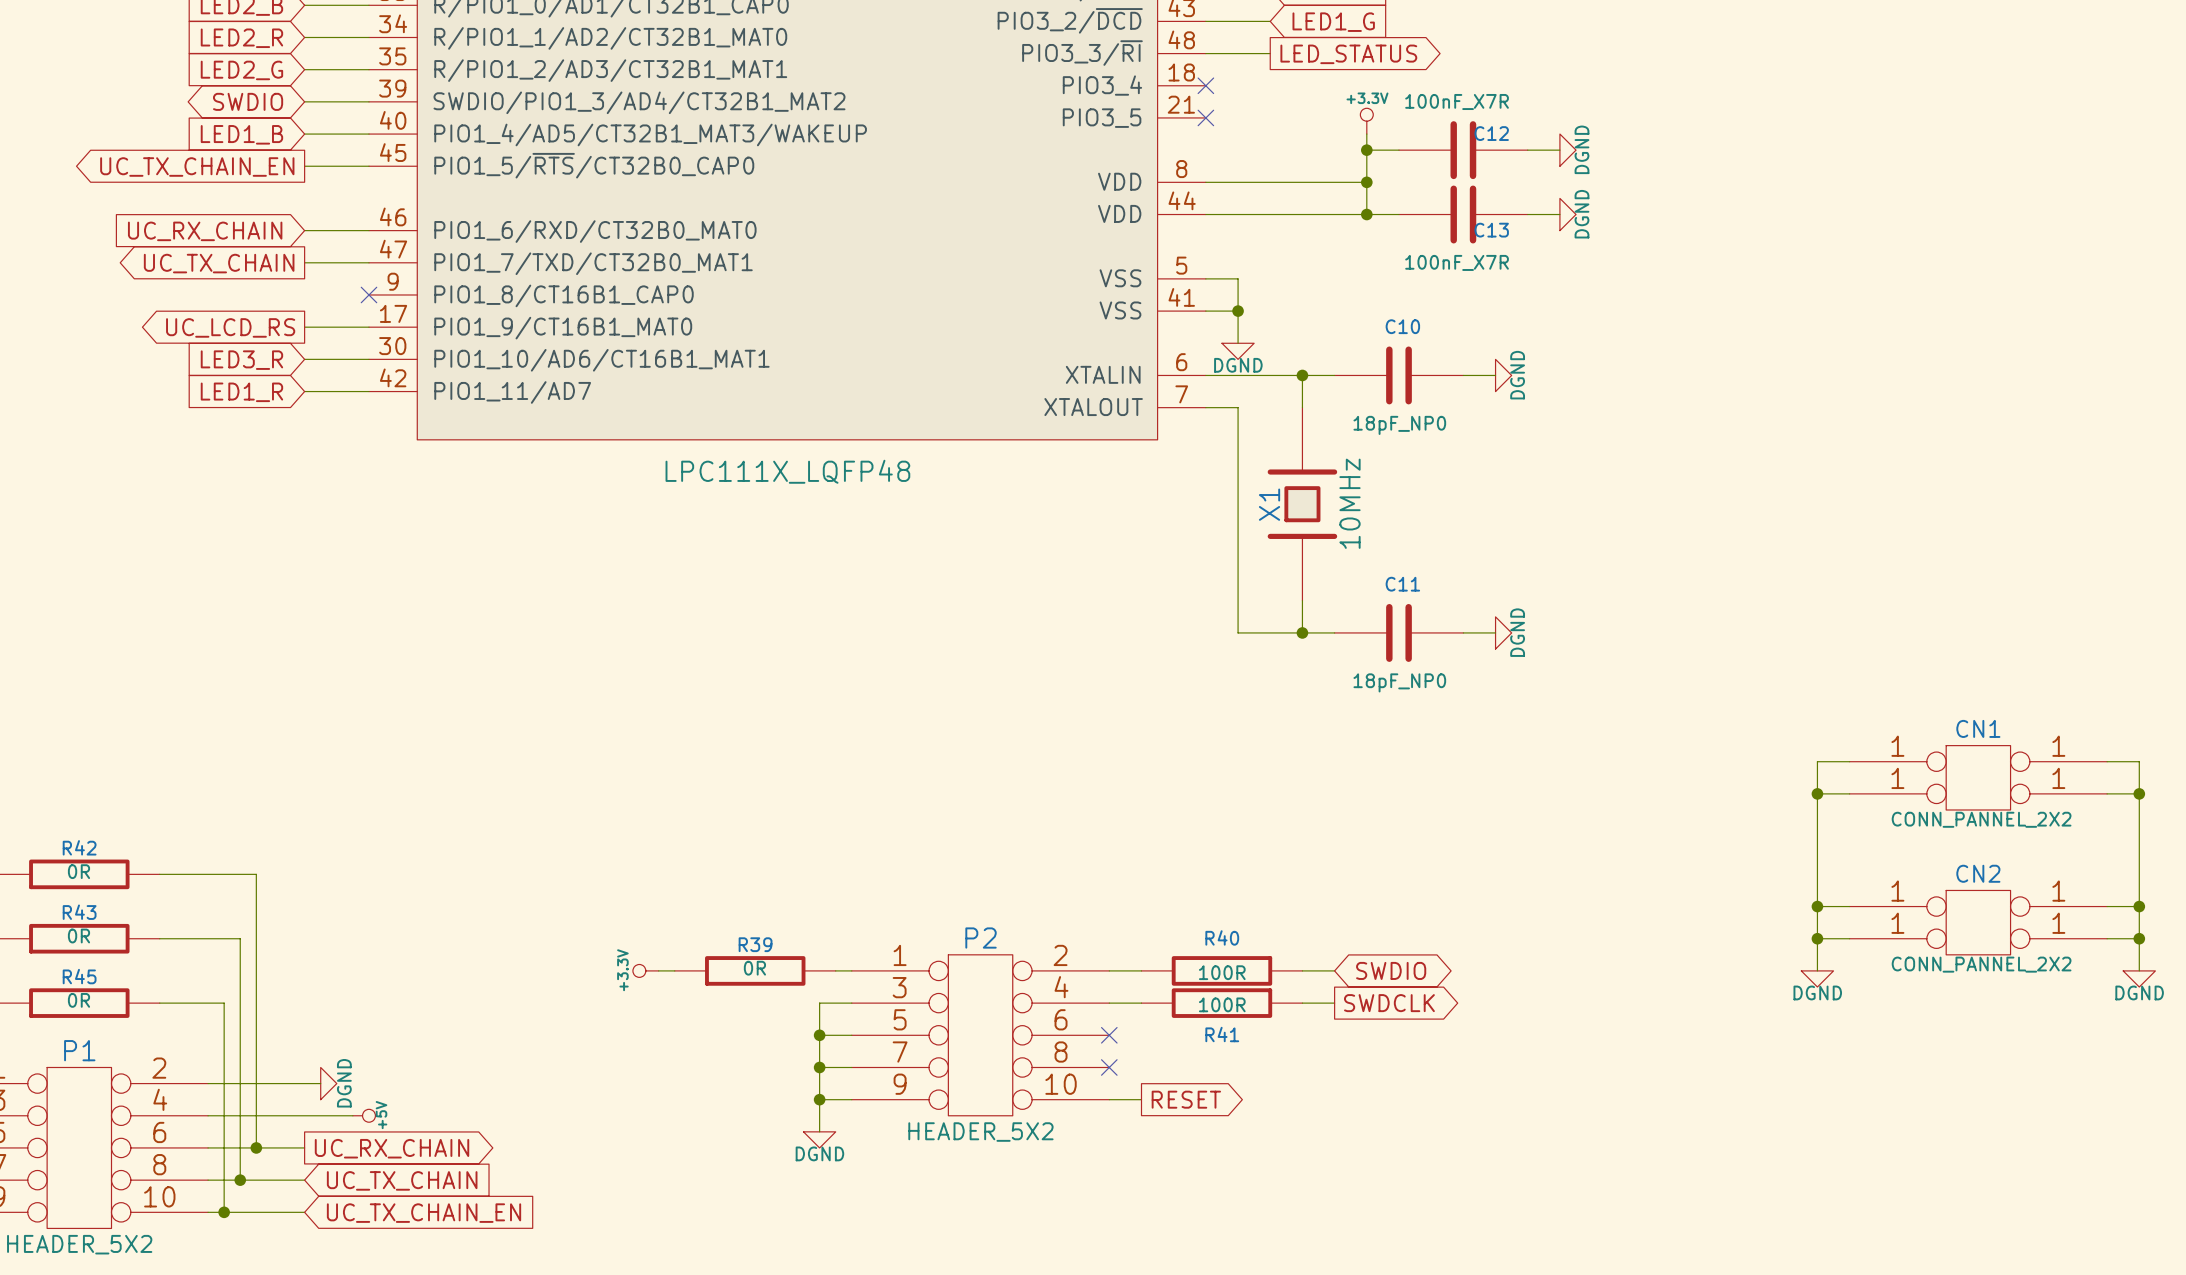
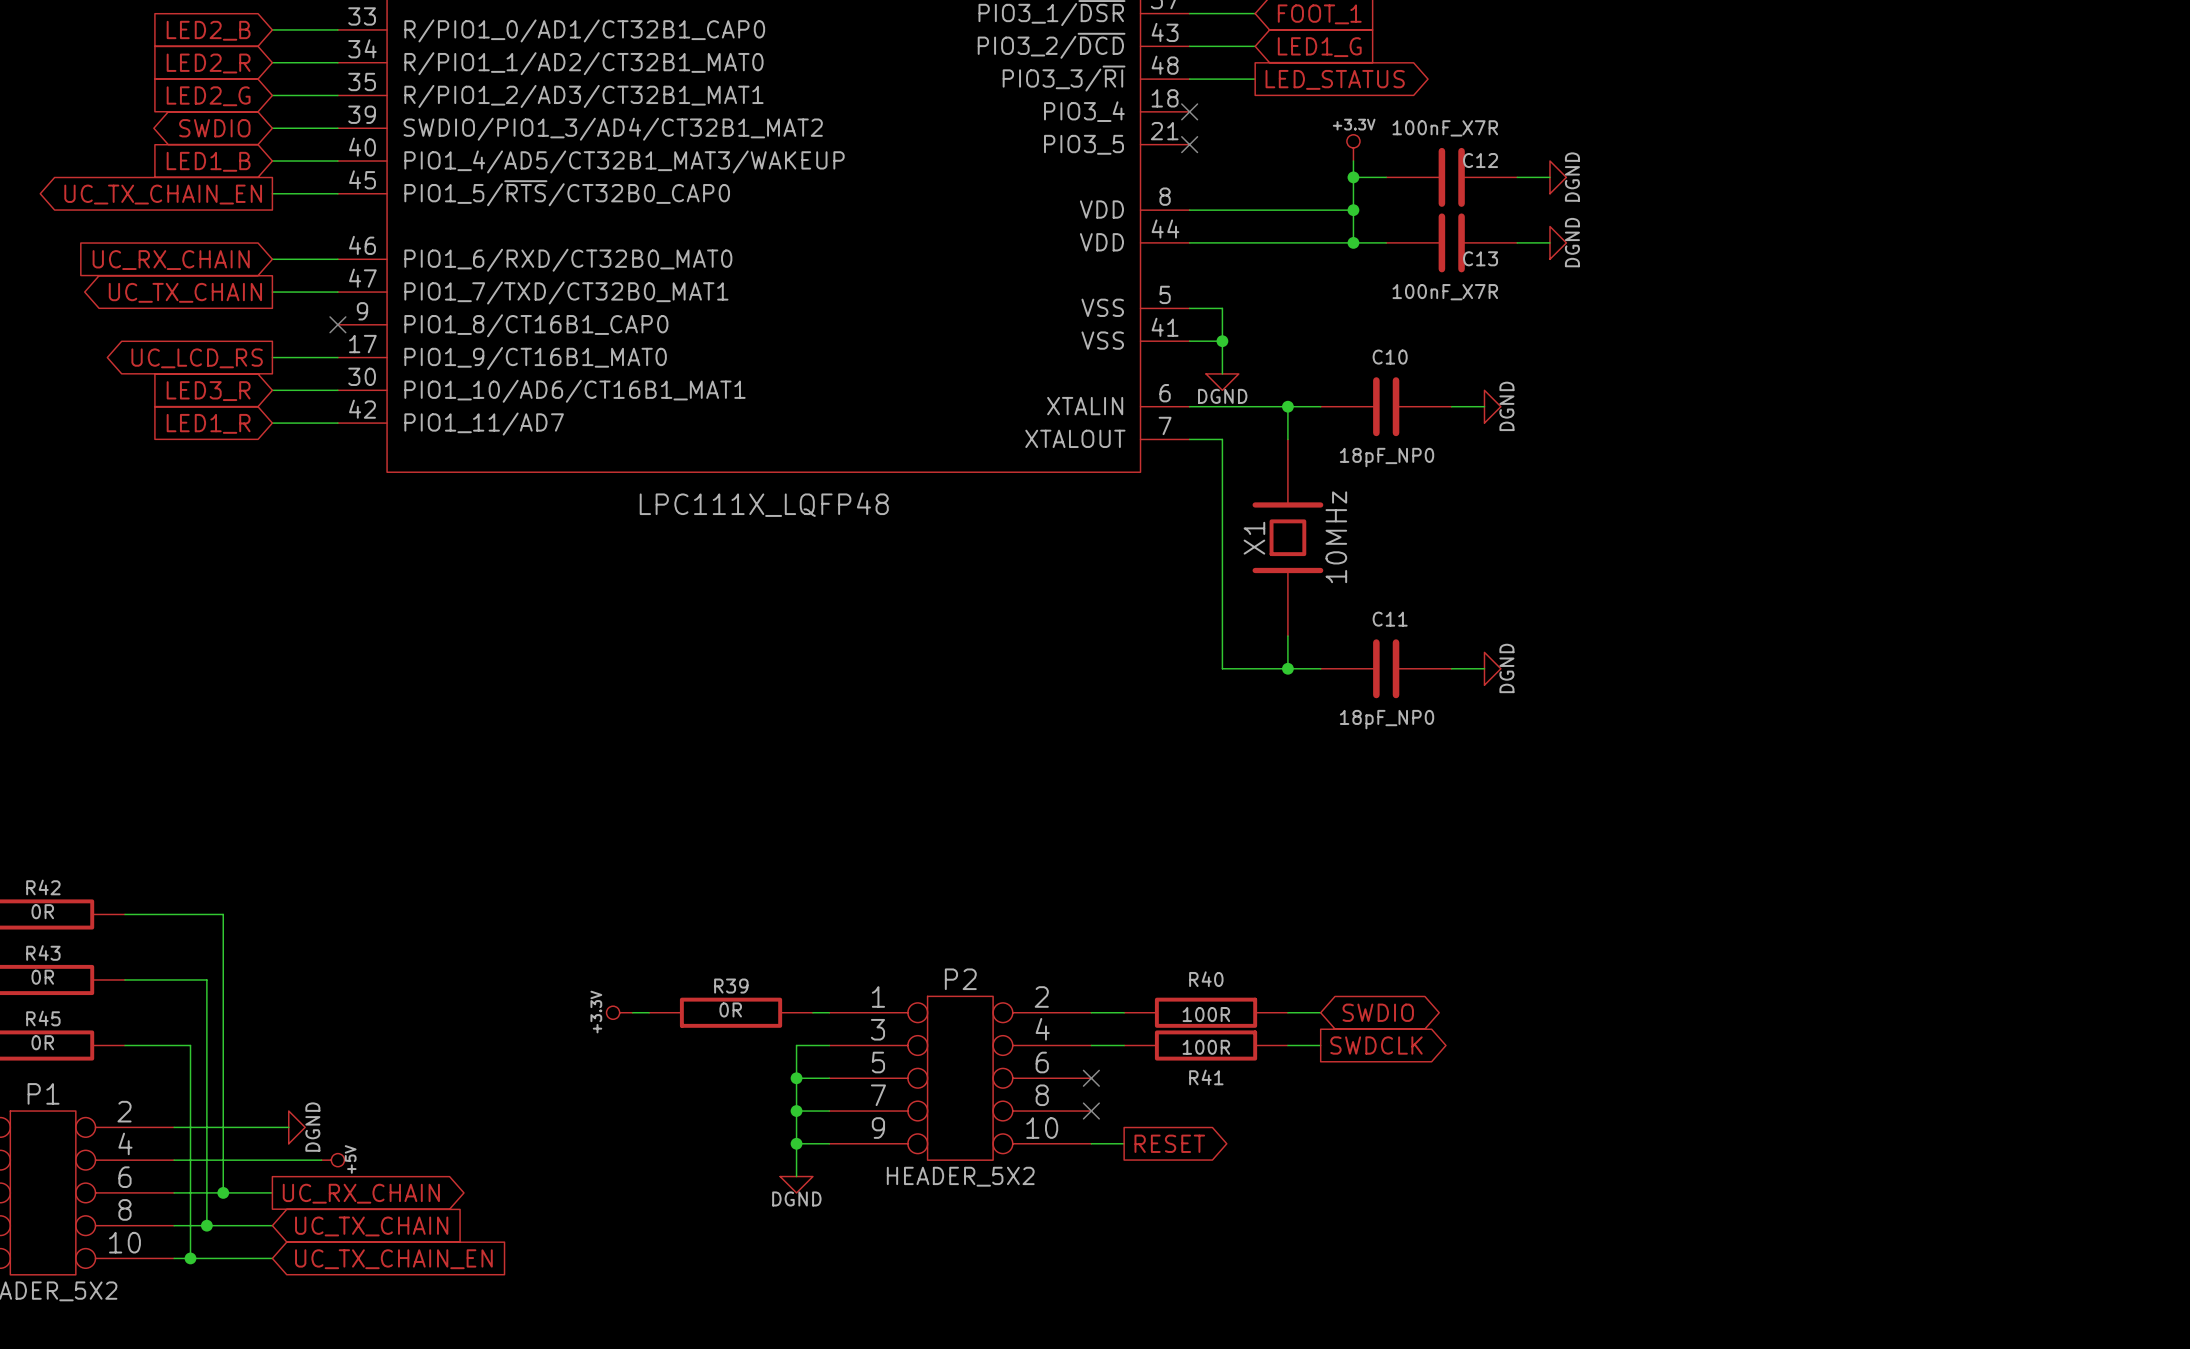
wire: (1849, 761) (1817, 761) (1817, 970) -> none
wire: (2107, 761) (2139, 761) (2139, 970) -> none
CN1: CONN_PANNEL_2X2 (1978, 777) -> none
wire: (1817, 793) (1849, 793) -> none
junction: (1817, 793) -> none
wire: (2107, 793) (2139, 793) -> none
junction: (2139, 793) -> none
wire: (1817, 906) (1849, 906) -> none
junction: (1817, 906) -> none
wire: (2107, 906) (2139, 906) -> none
junction: (2139, 906) -> none
CN2: CONN_PANNEL_2X2 (1978, 922) -> none
wire: (1817, 938) (1849, 938) -> none
junction: (1817, 938) -> none
wire: (2107, 938) (2139, 938) -> none
junction: (2139, 938) -> none
power symbol: DGND (1817, 978) -> none
power symbol: DGND (2139, 978) -> none

